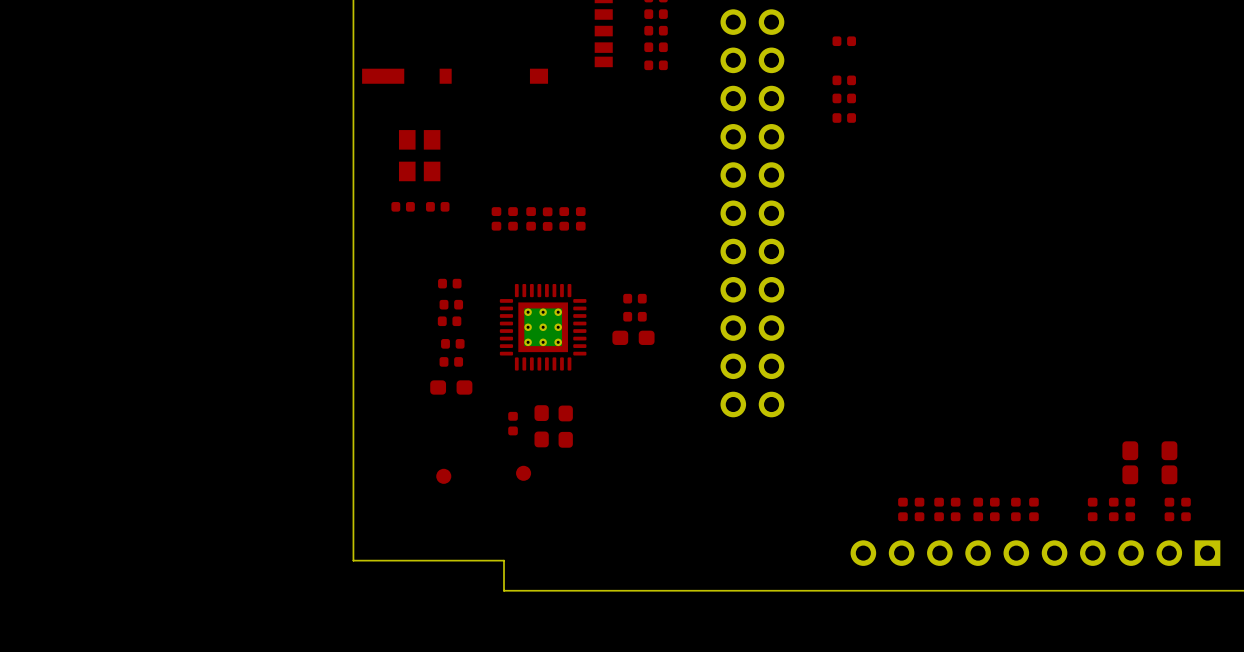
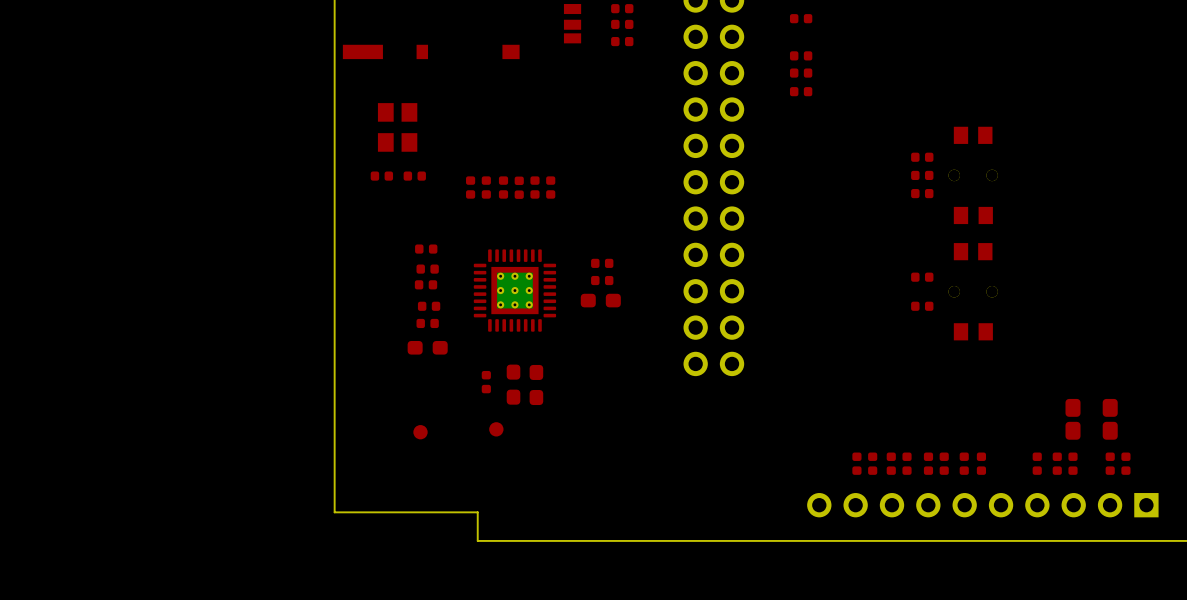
part: none -> (922, 157)
part: none -> (922, 175)
part: none -> (973, 175)
part: none -> (922, 193)
part: none -> (922, 277)
part: none -> (973, 291)
part: none -> (922, 306)

